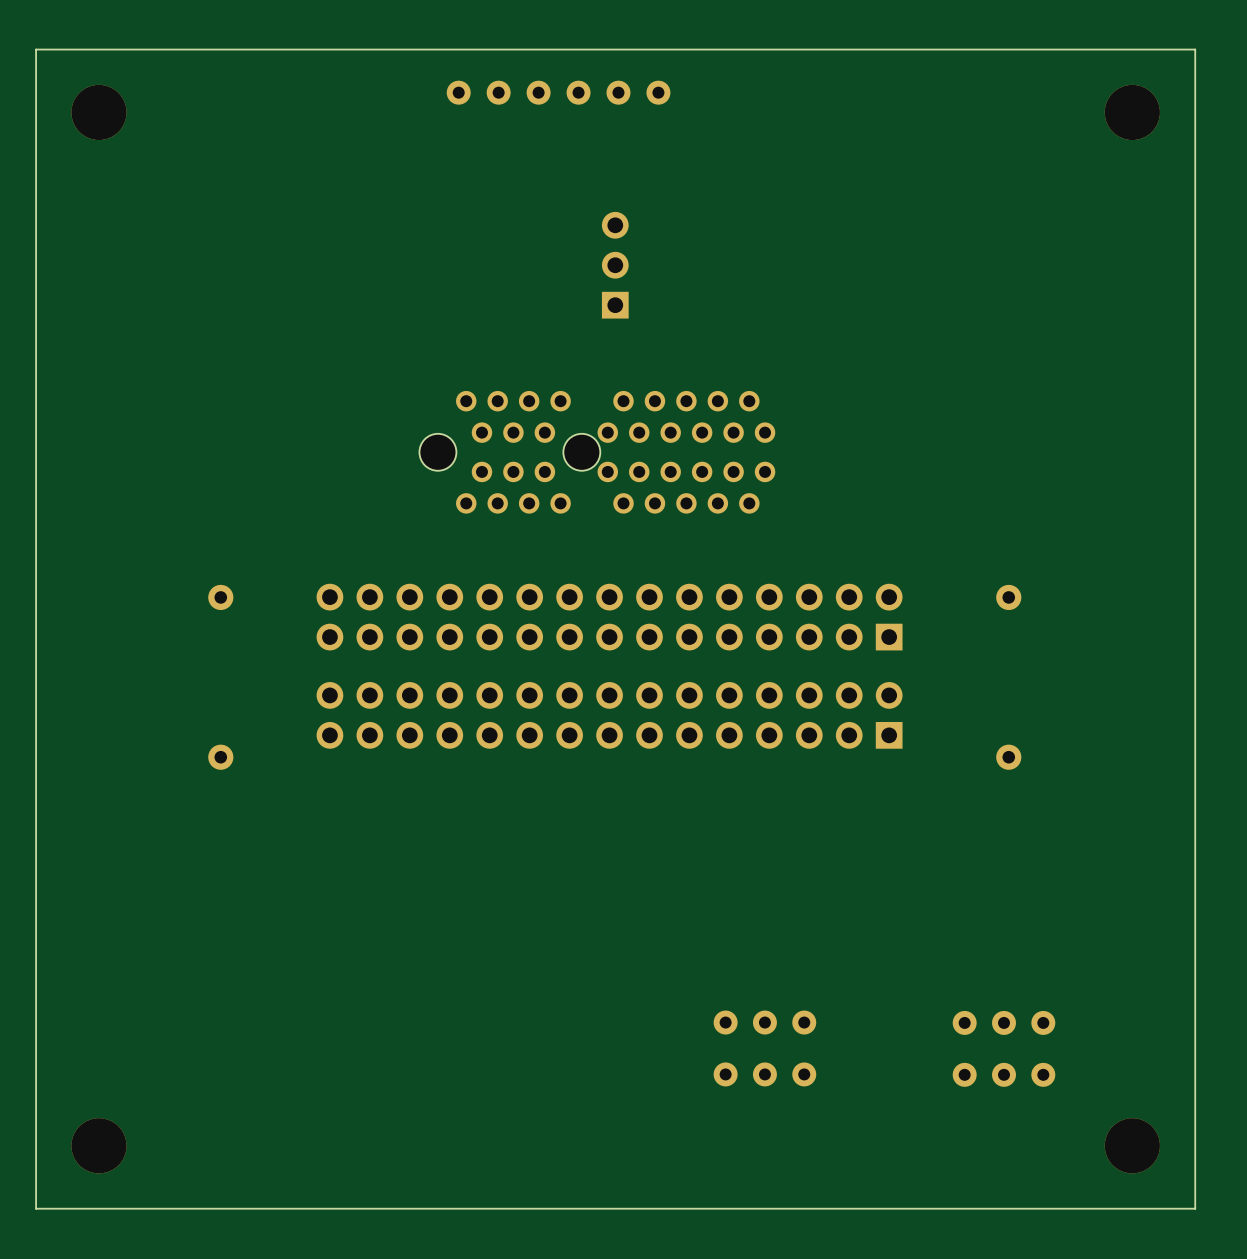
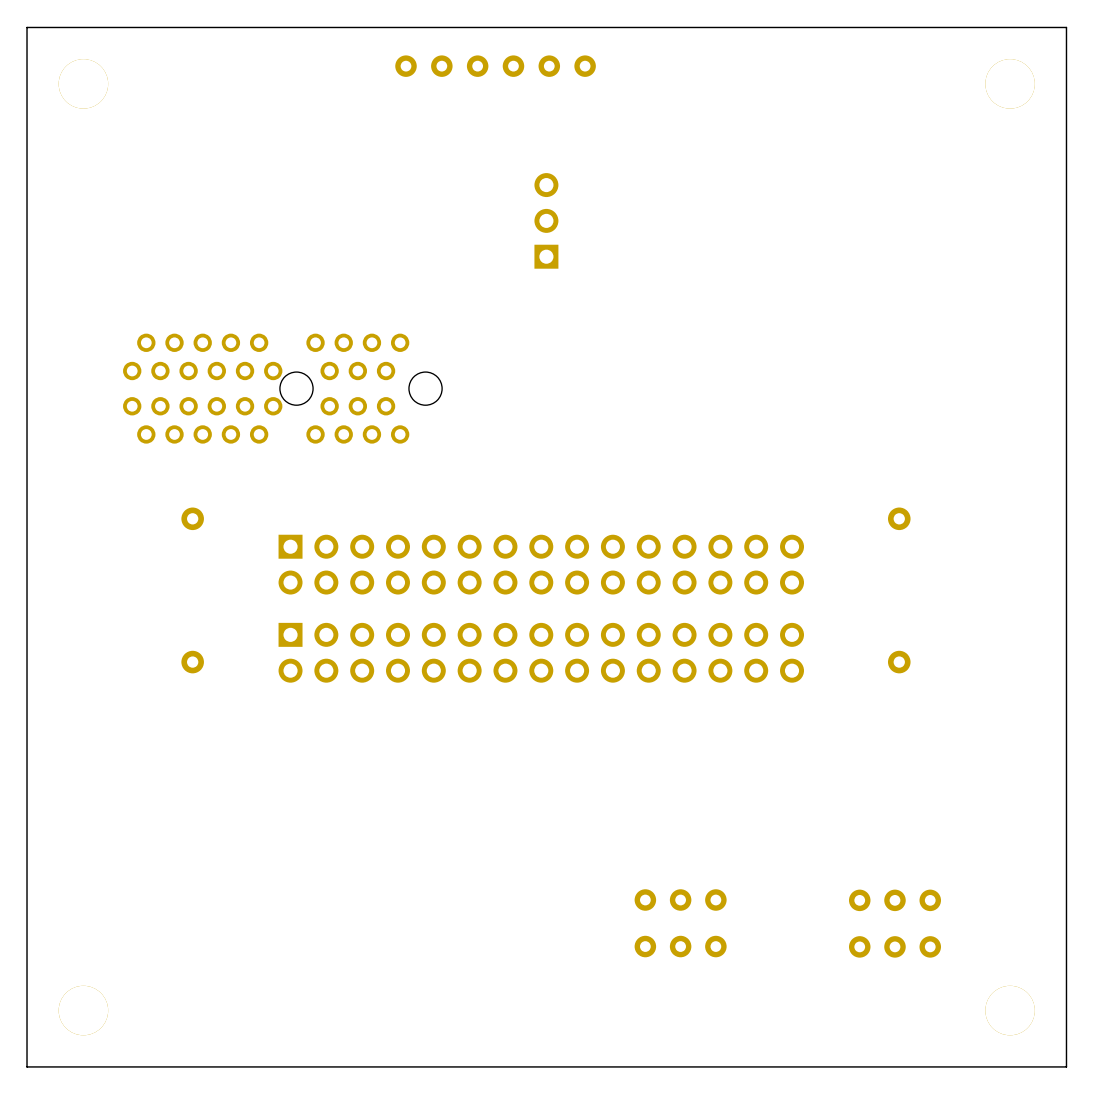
part rotation: 0° (597, 452) -> 180° (282, 388)
part position: (597, 452) -> (282, 388)
part rotation: 0° (609, 617) -> 180° (541, 564)
part rotation: 0° (609, 715) -> 180° (541, 652)

